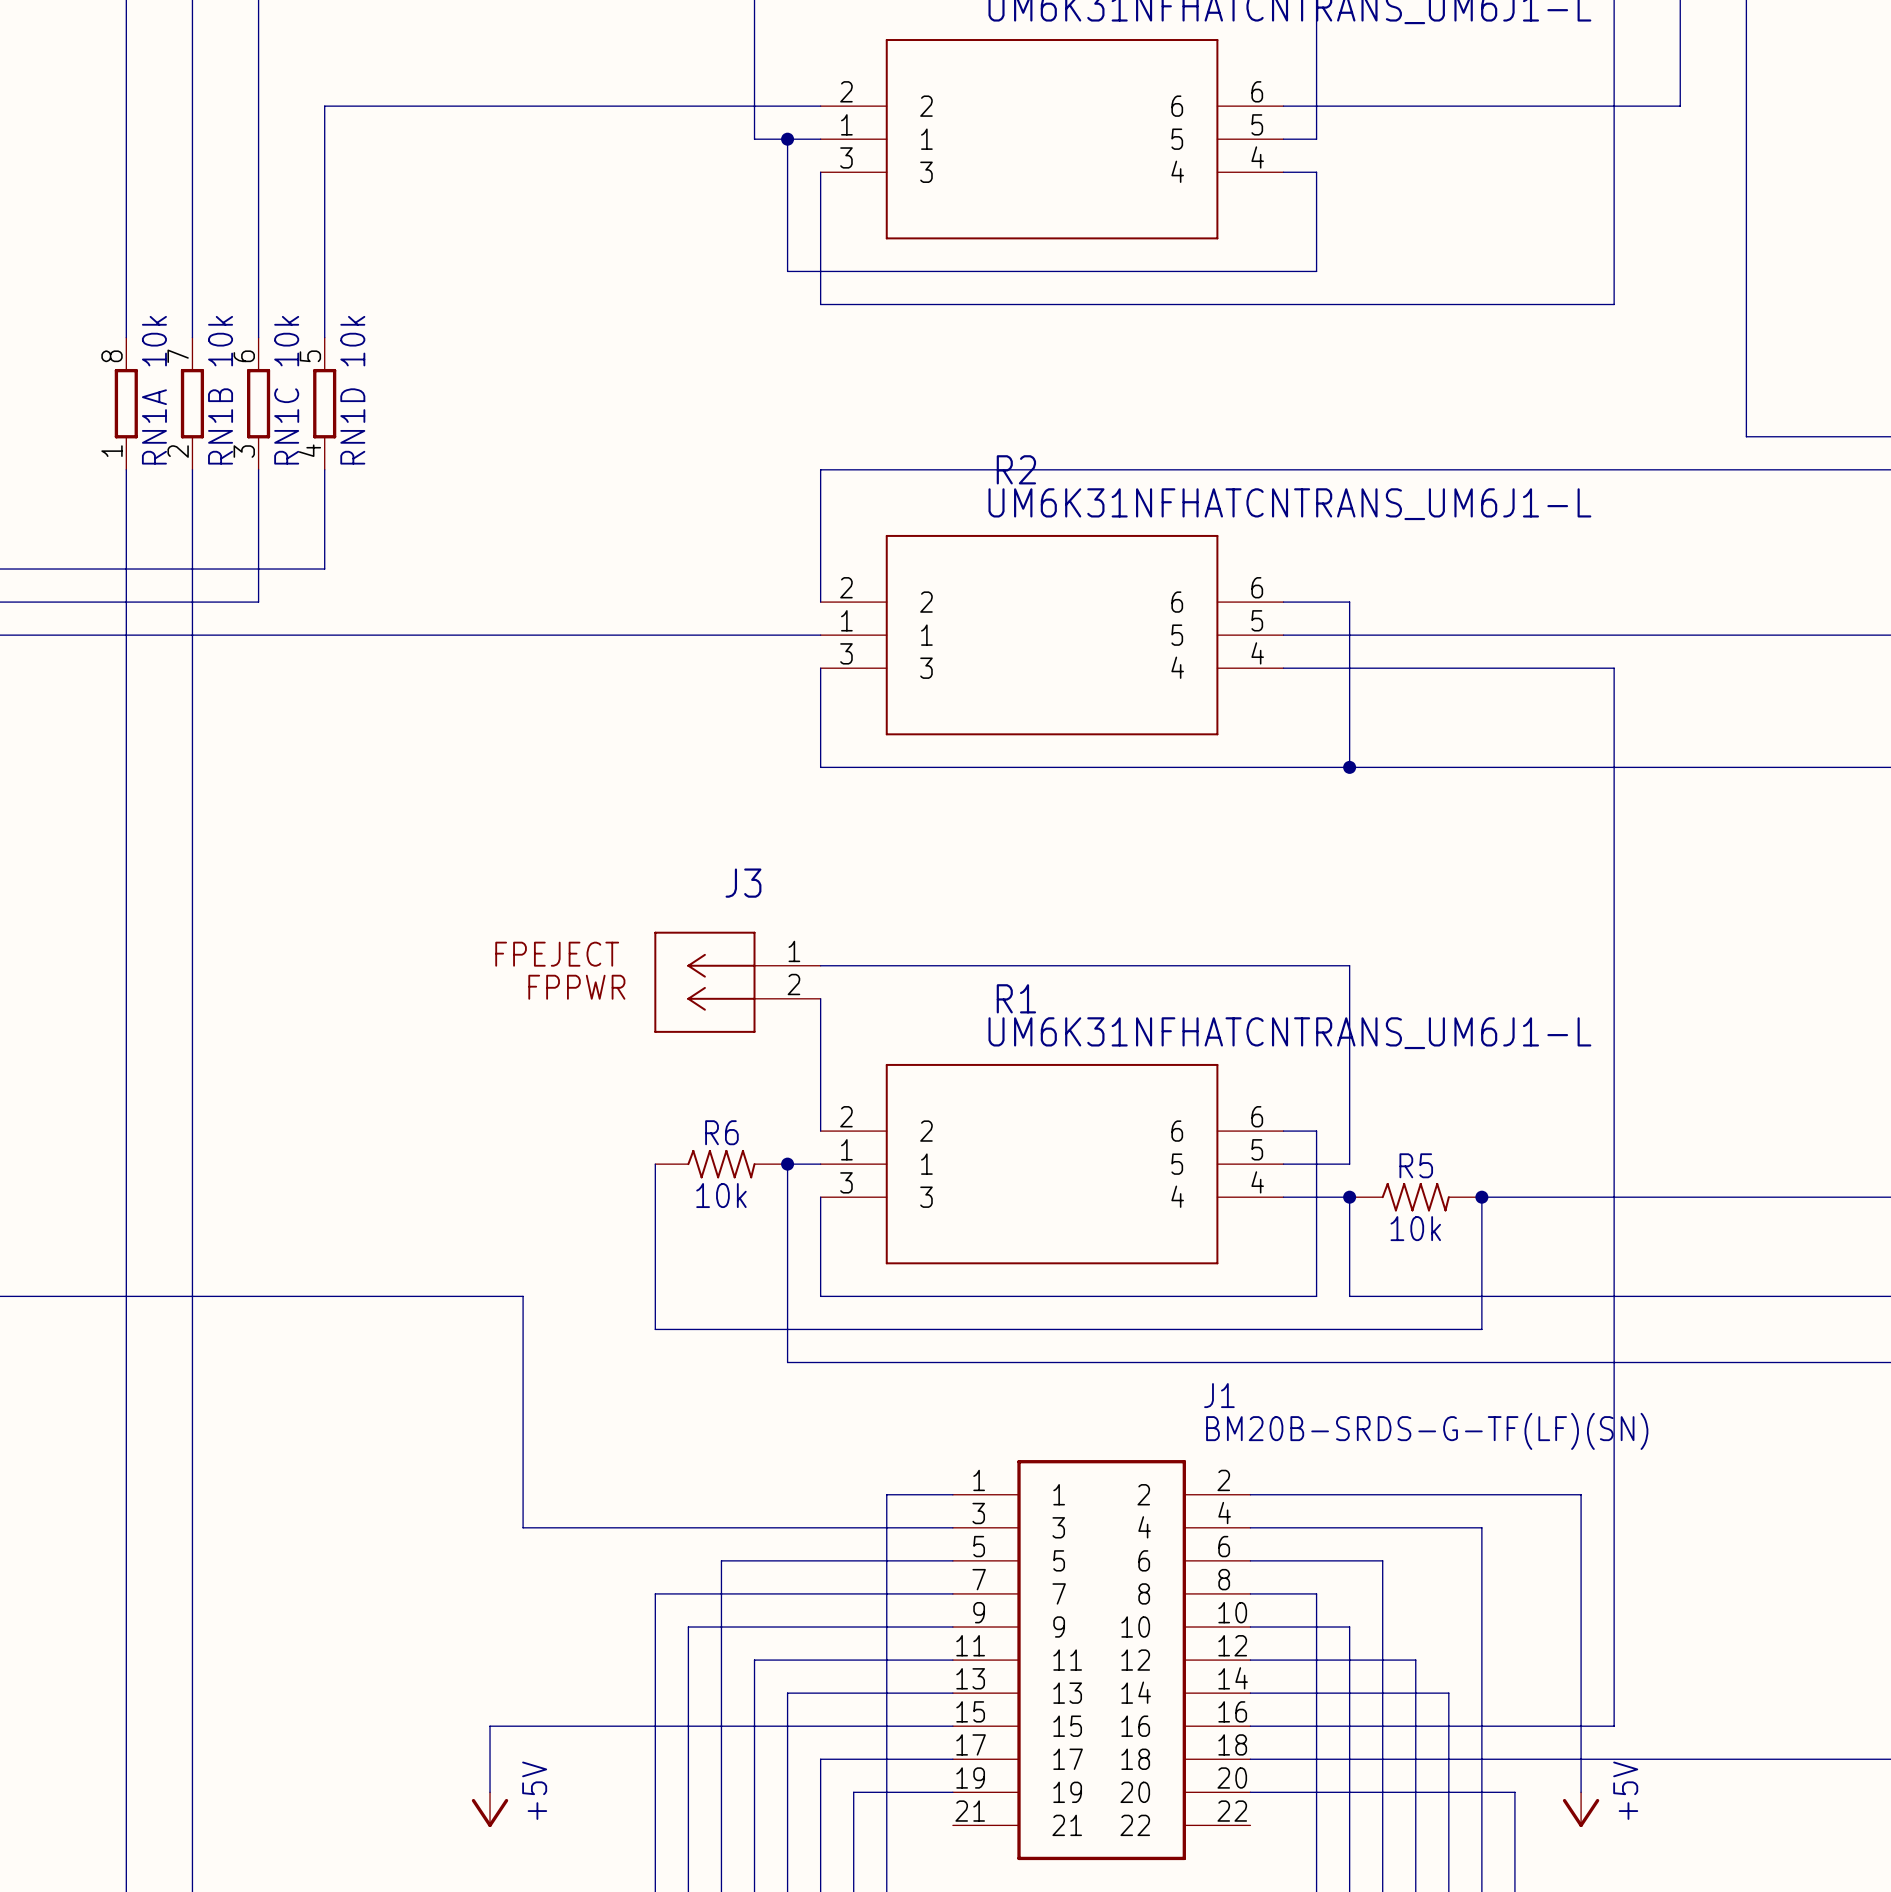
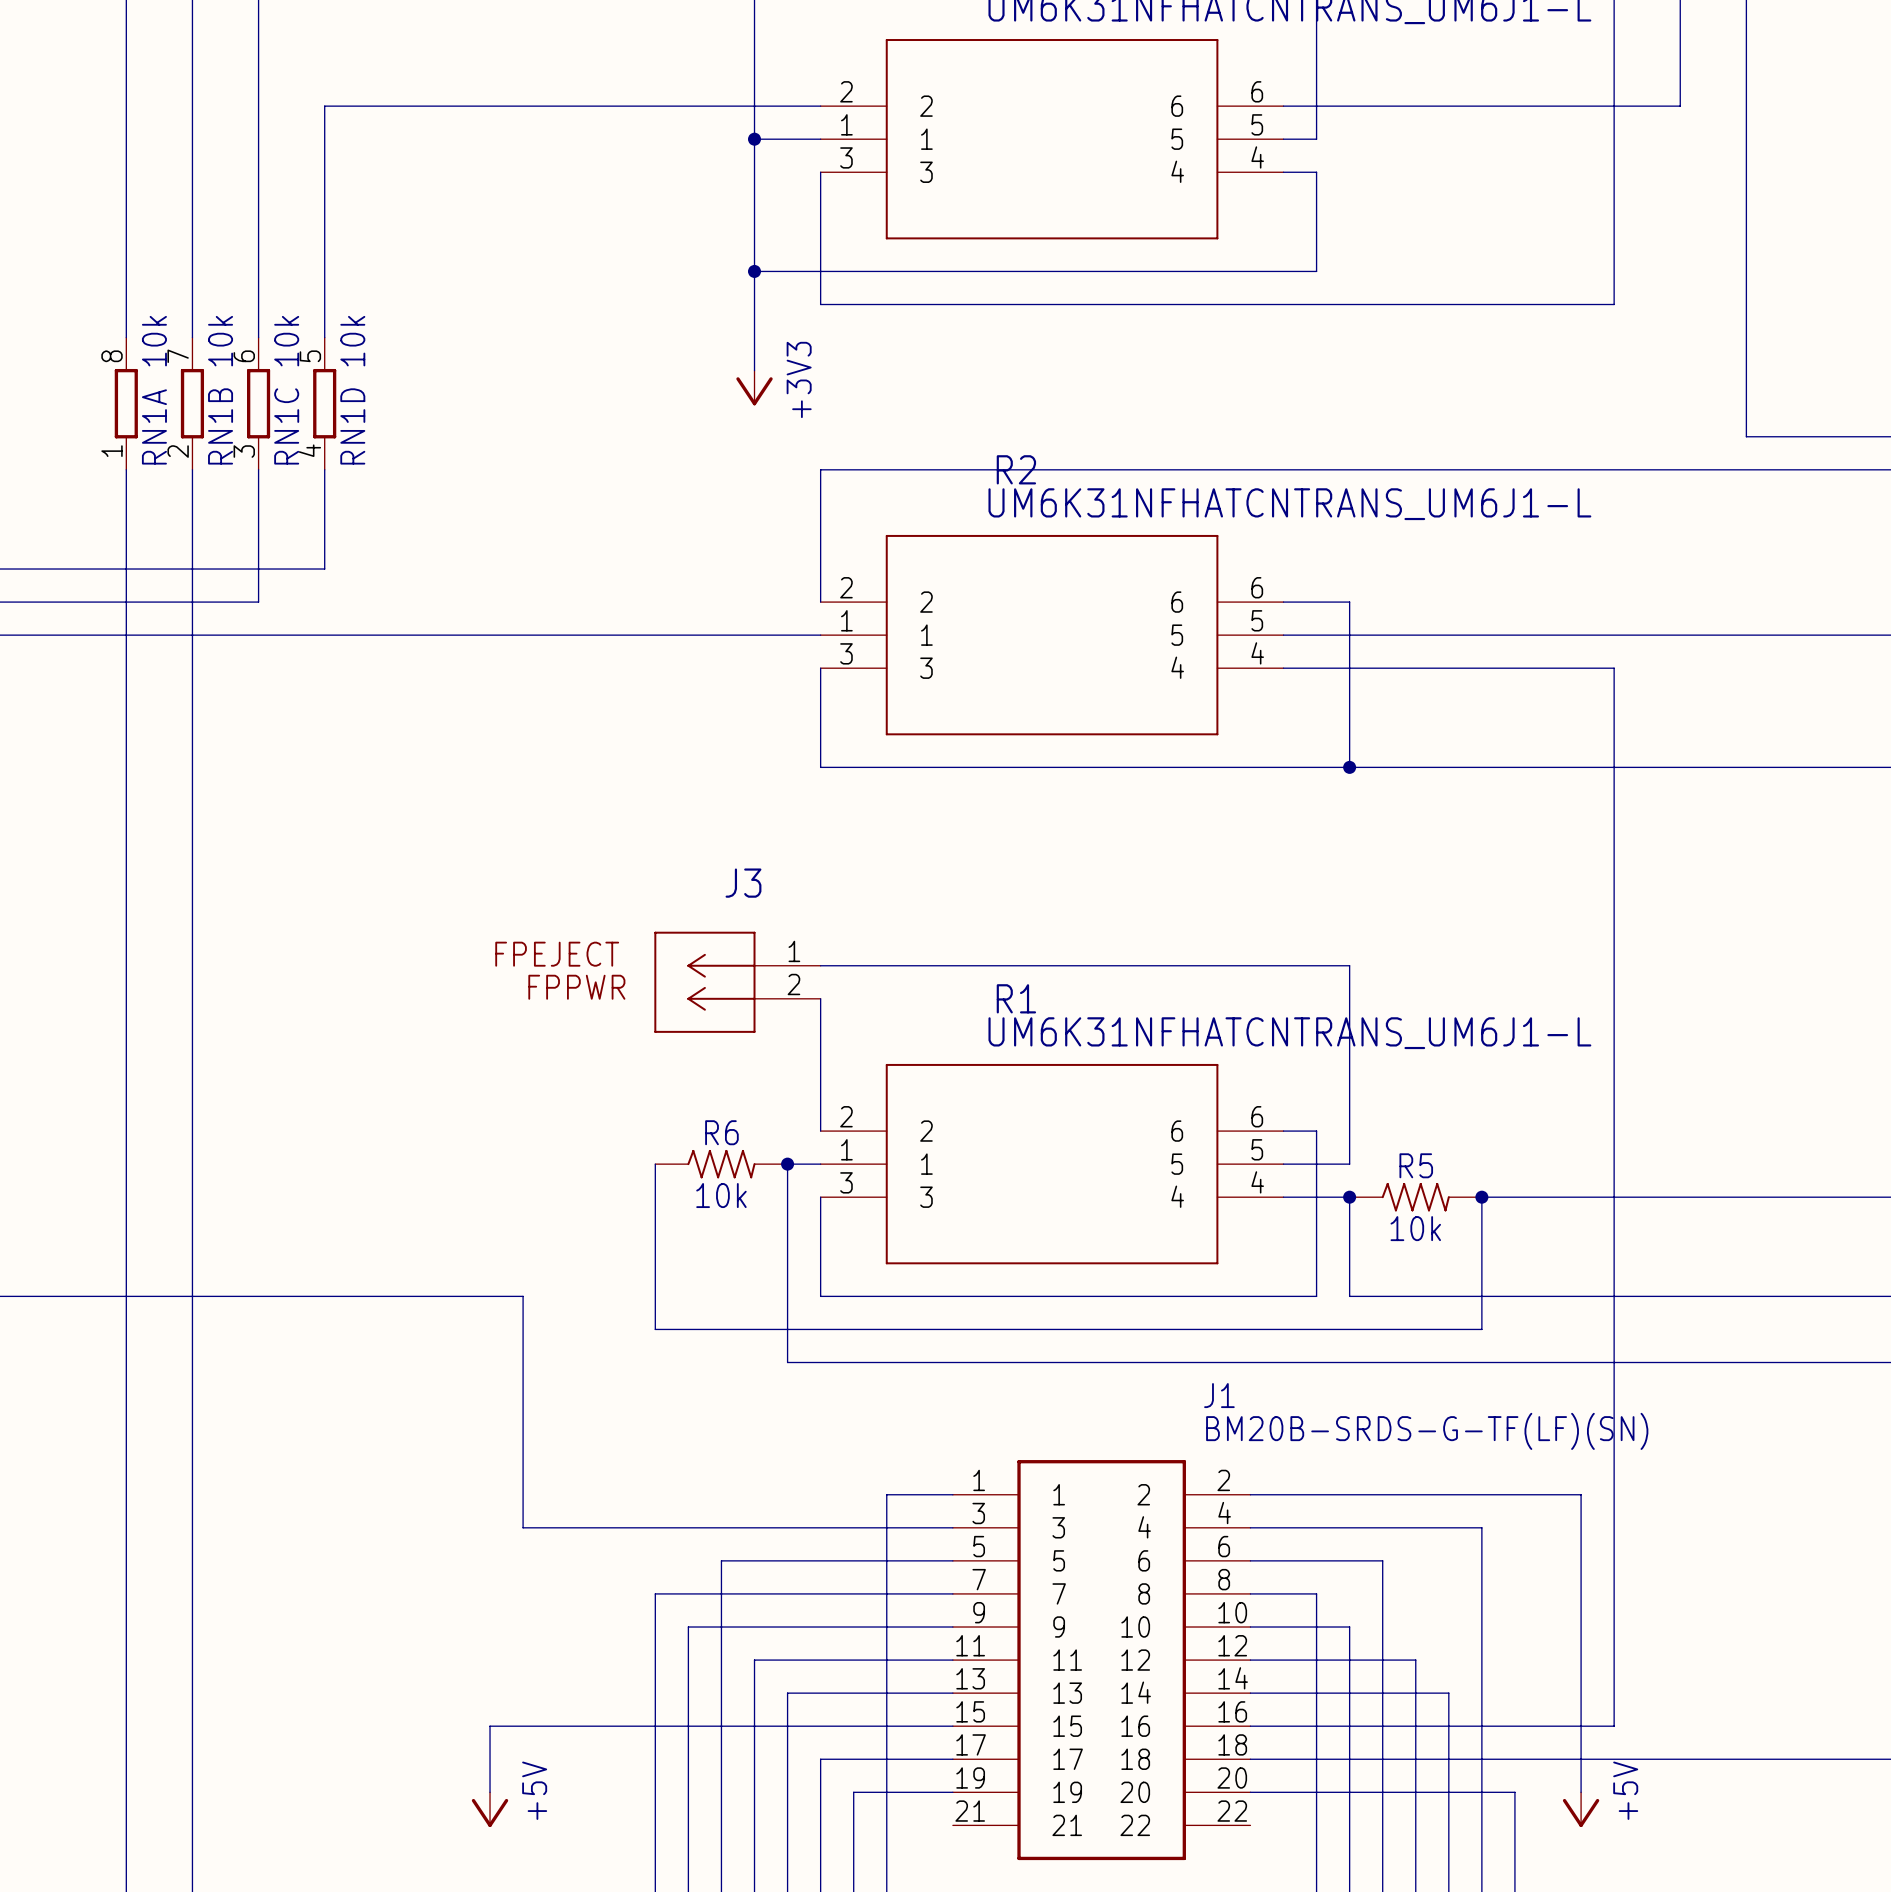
wire: none -> (754, 139) (754, 370)
wire: (787, 139) (787, 271) -> (754, 271) (787, 271)
junction position: (787, 139) -> (754, 139)
junction: none -> (754, 271)
power symbol: none -> +3V3 (754, 387)

